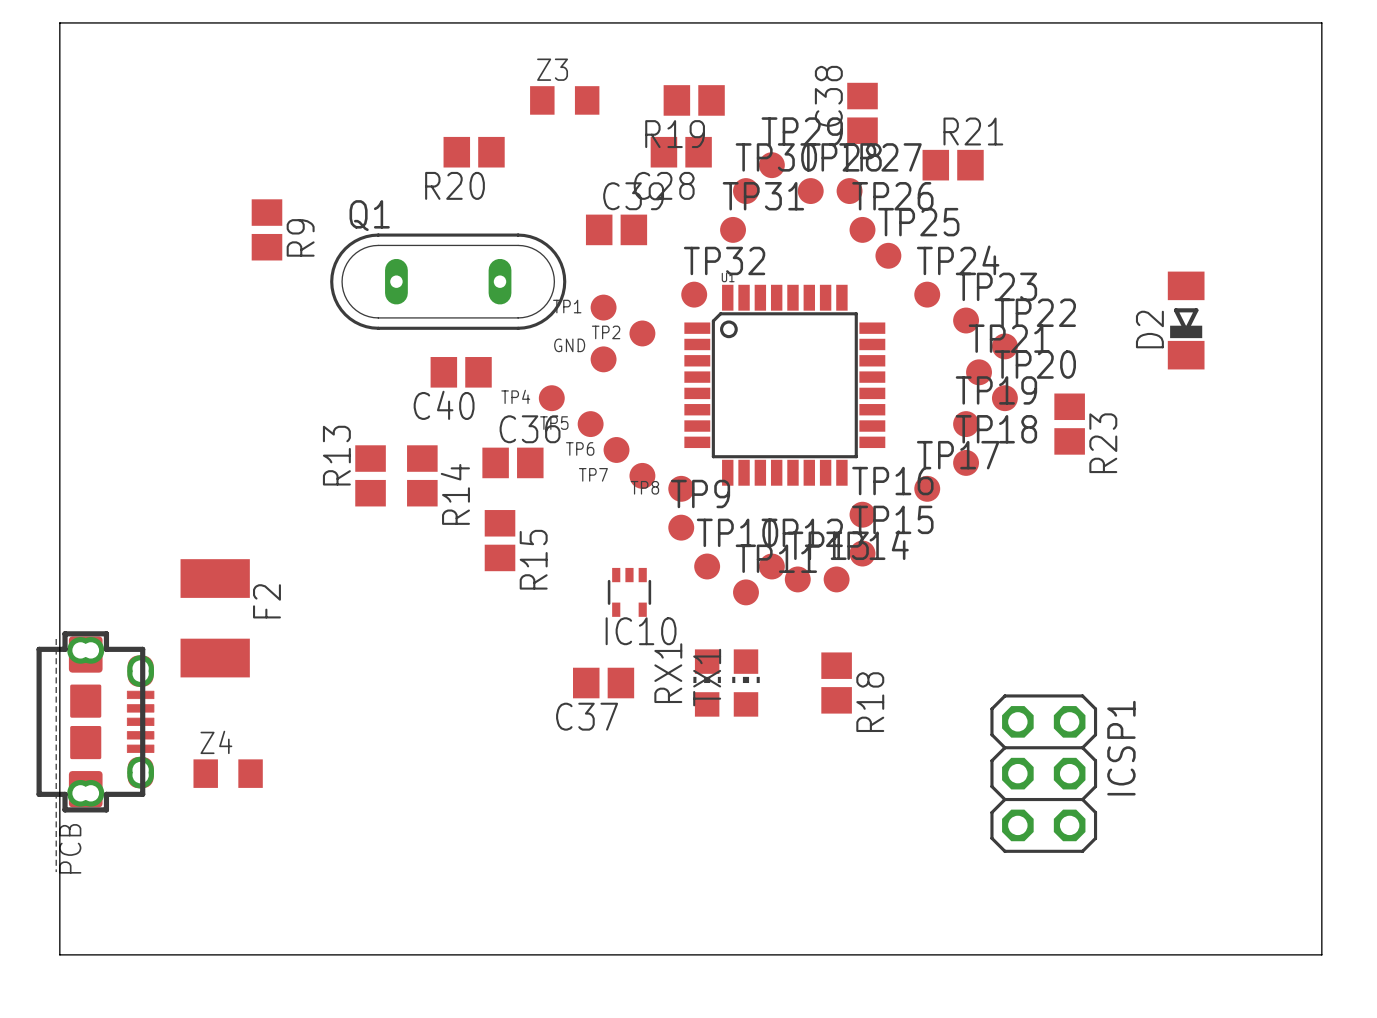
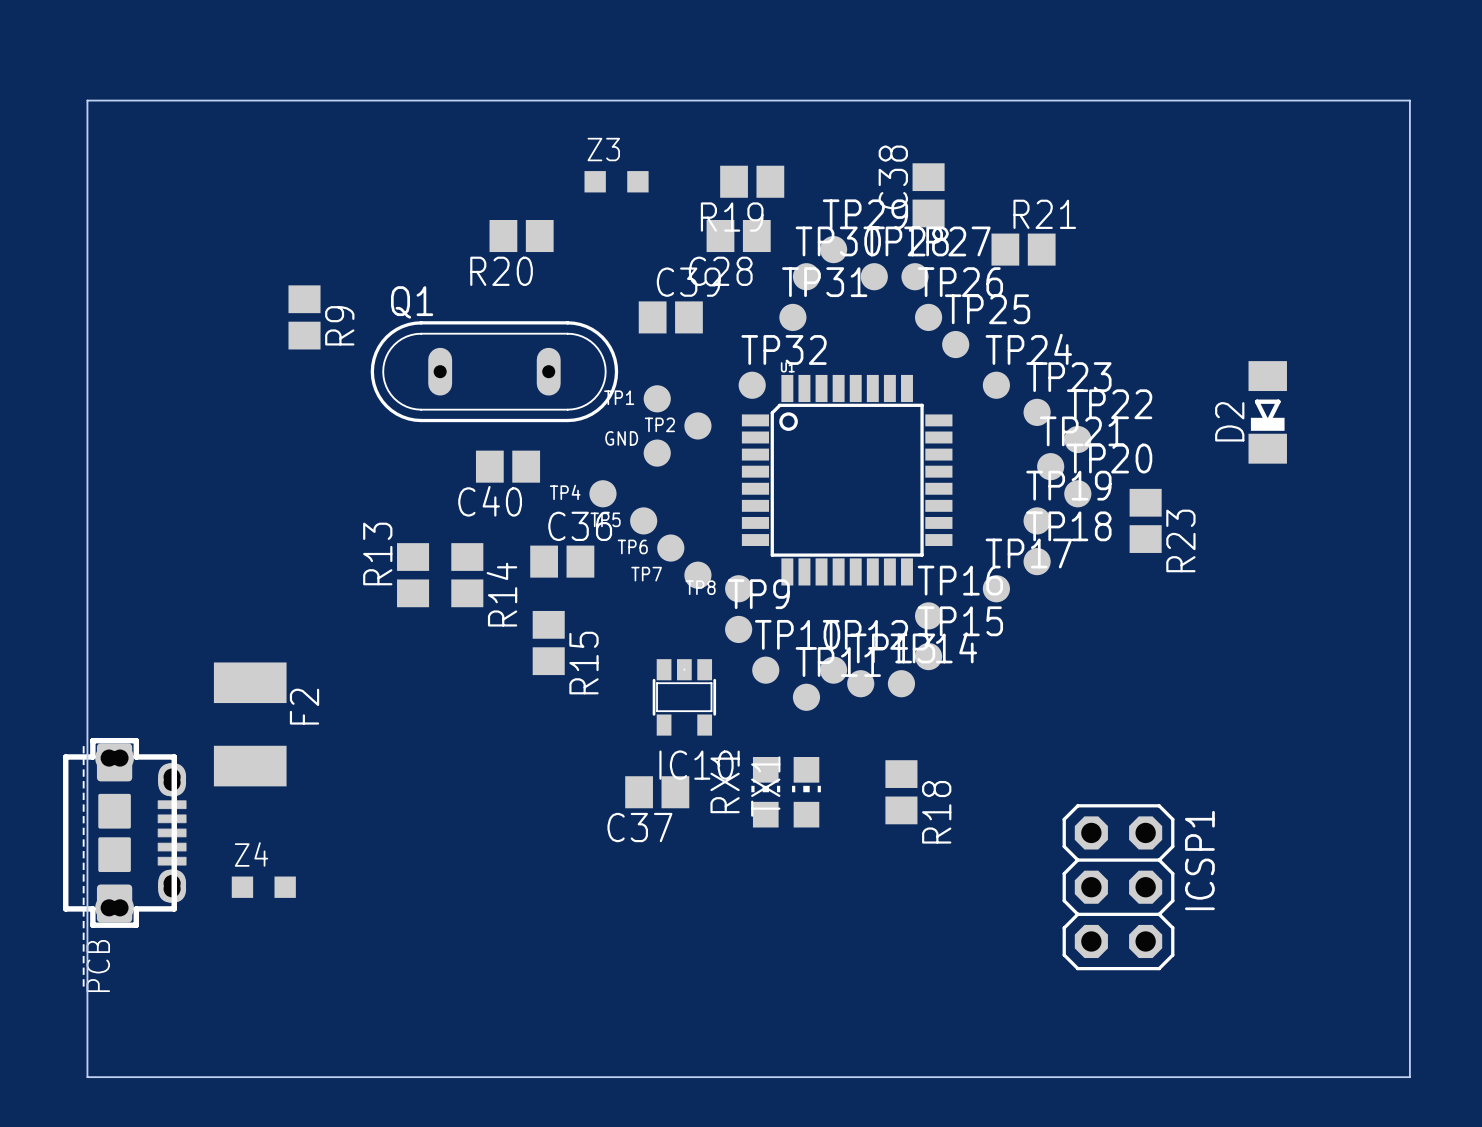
Z3 footprint: [530, 86, 600, 115] -> [584, 171, 649, 193]
IC10 footprint: [607, 567, 652, 617] -> [652, 659, 717, 736]
Z4 footprint: [193, 759, 263, 788] -> [231, 876, 296, 898]

